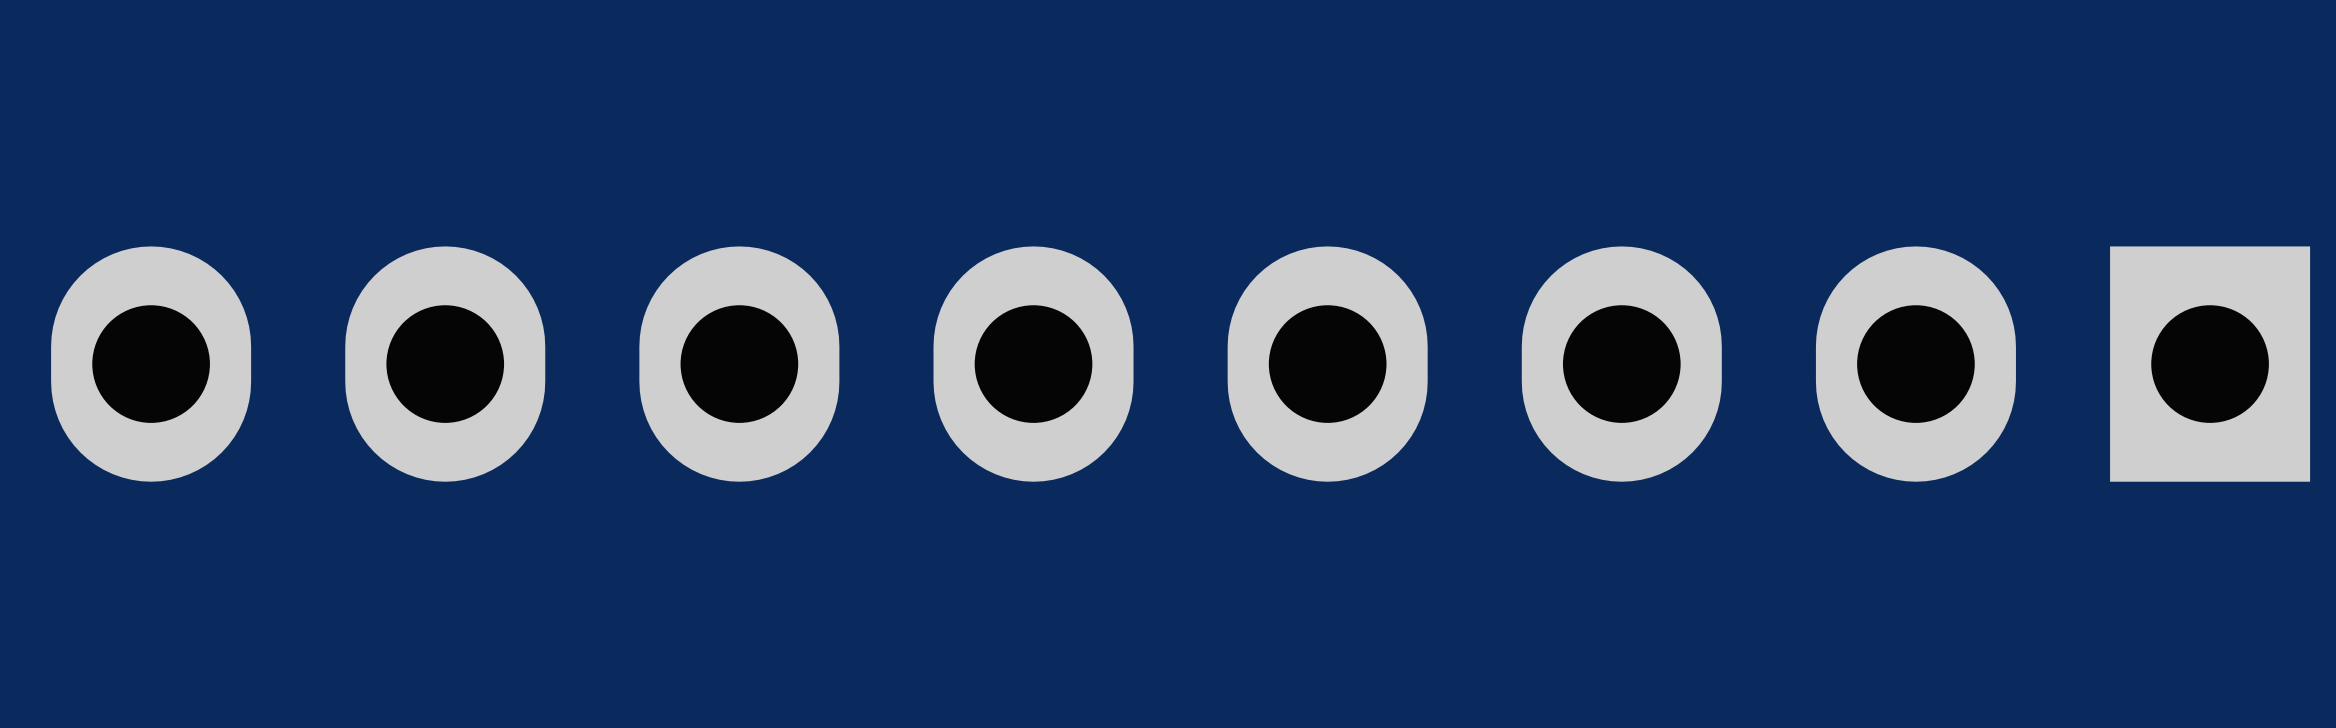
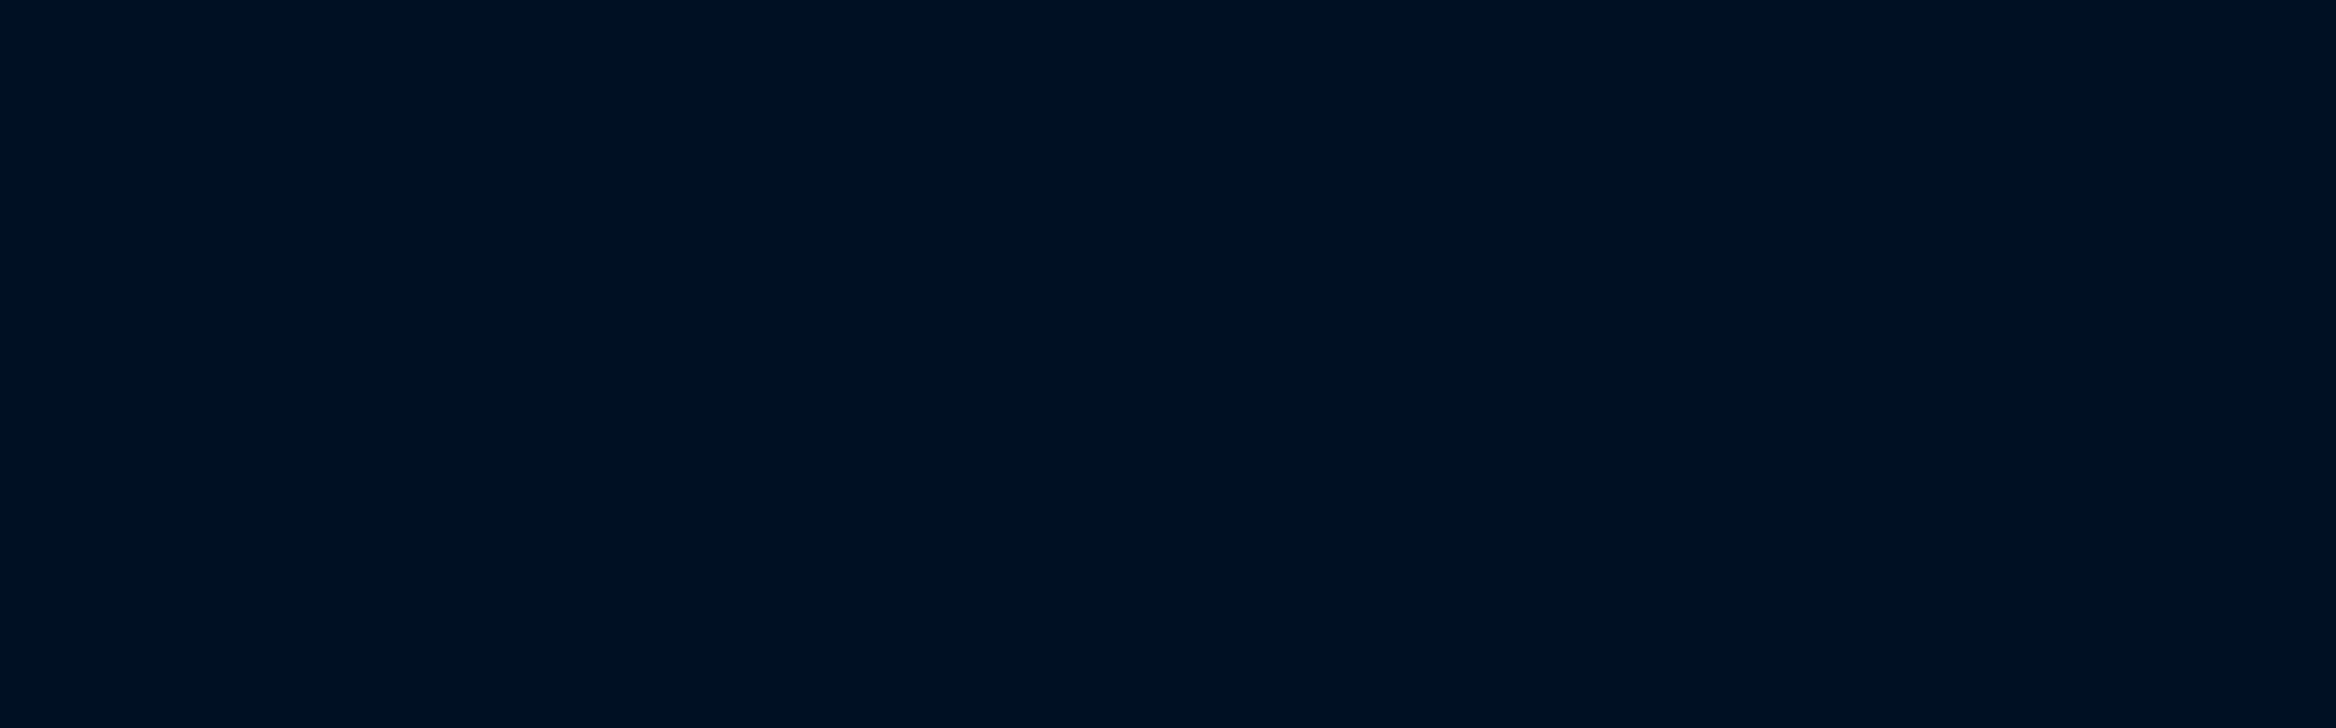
part: (1180, 364) -> none

